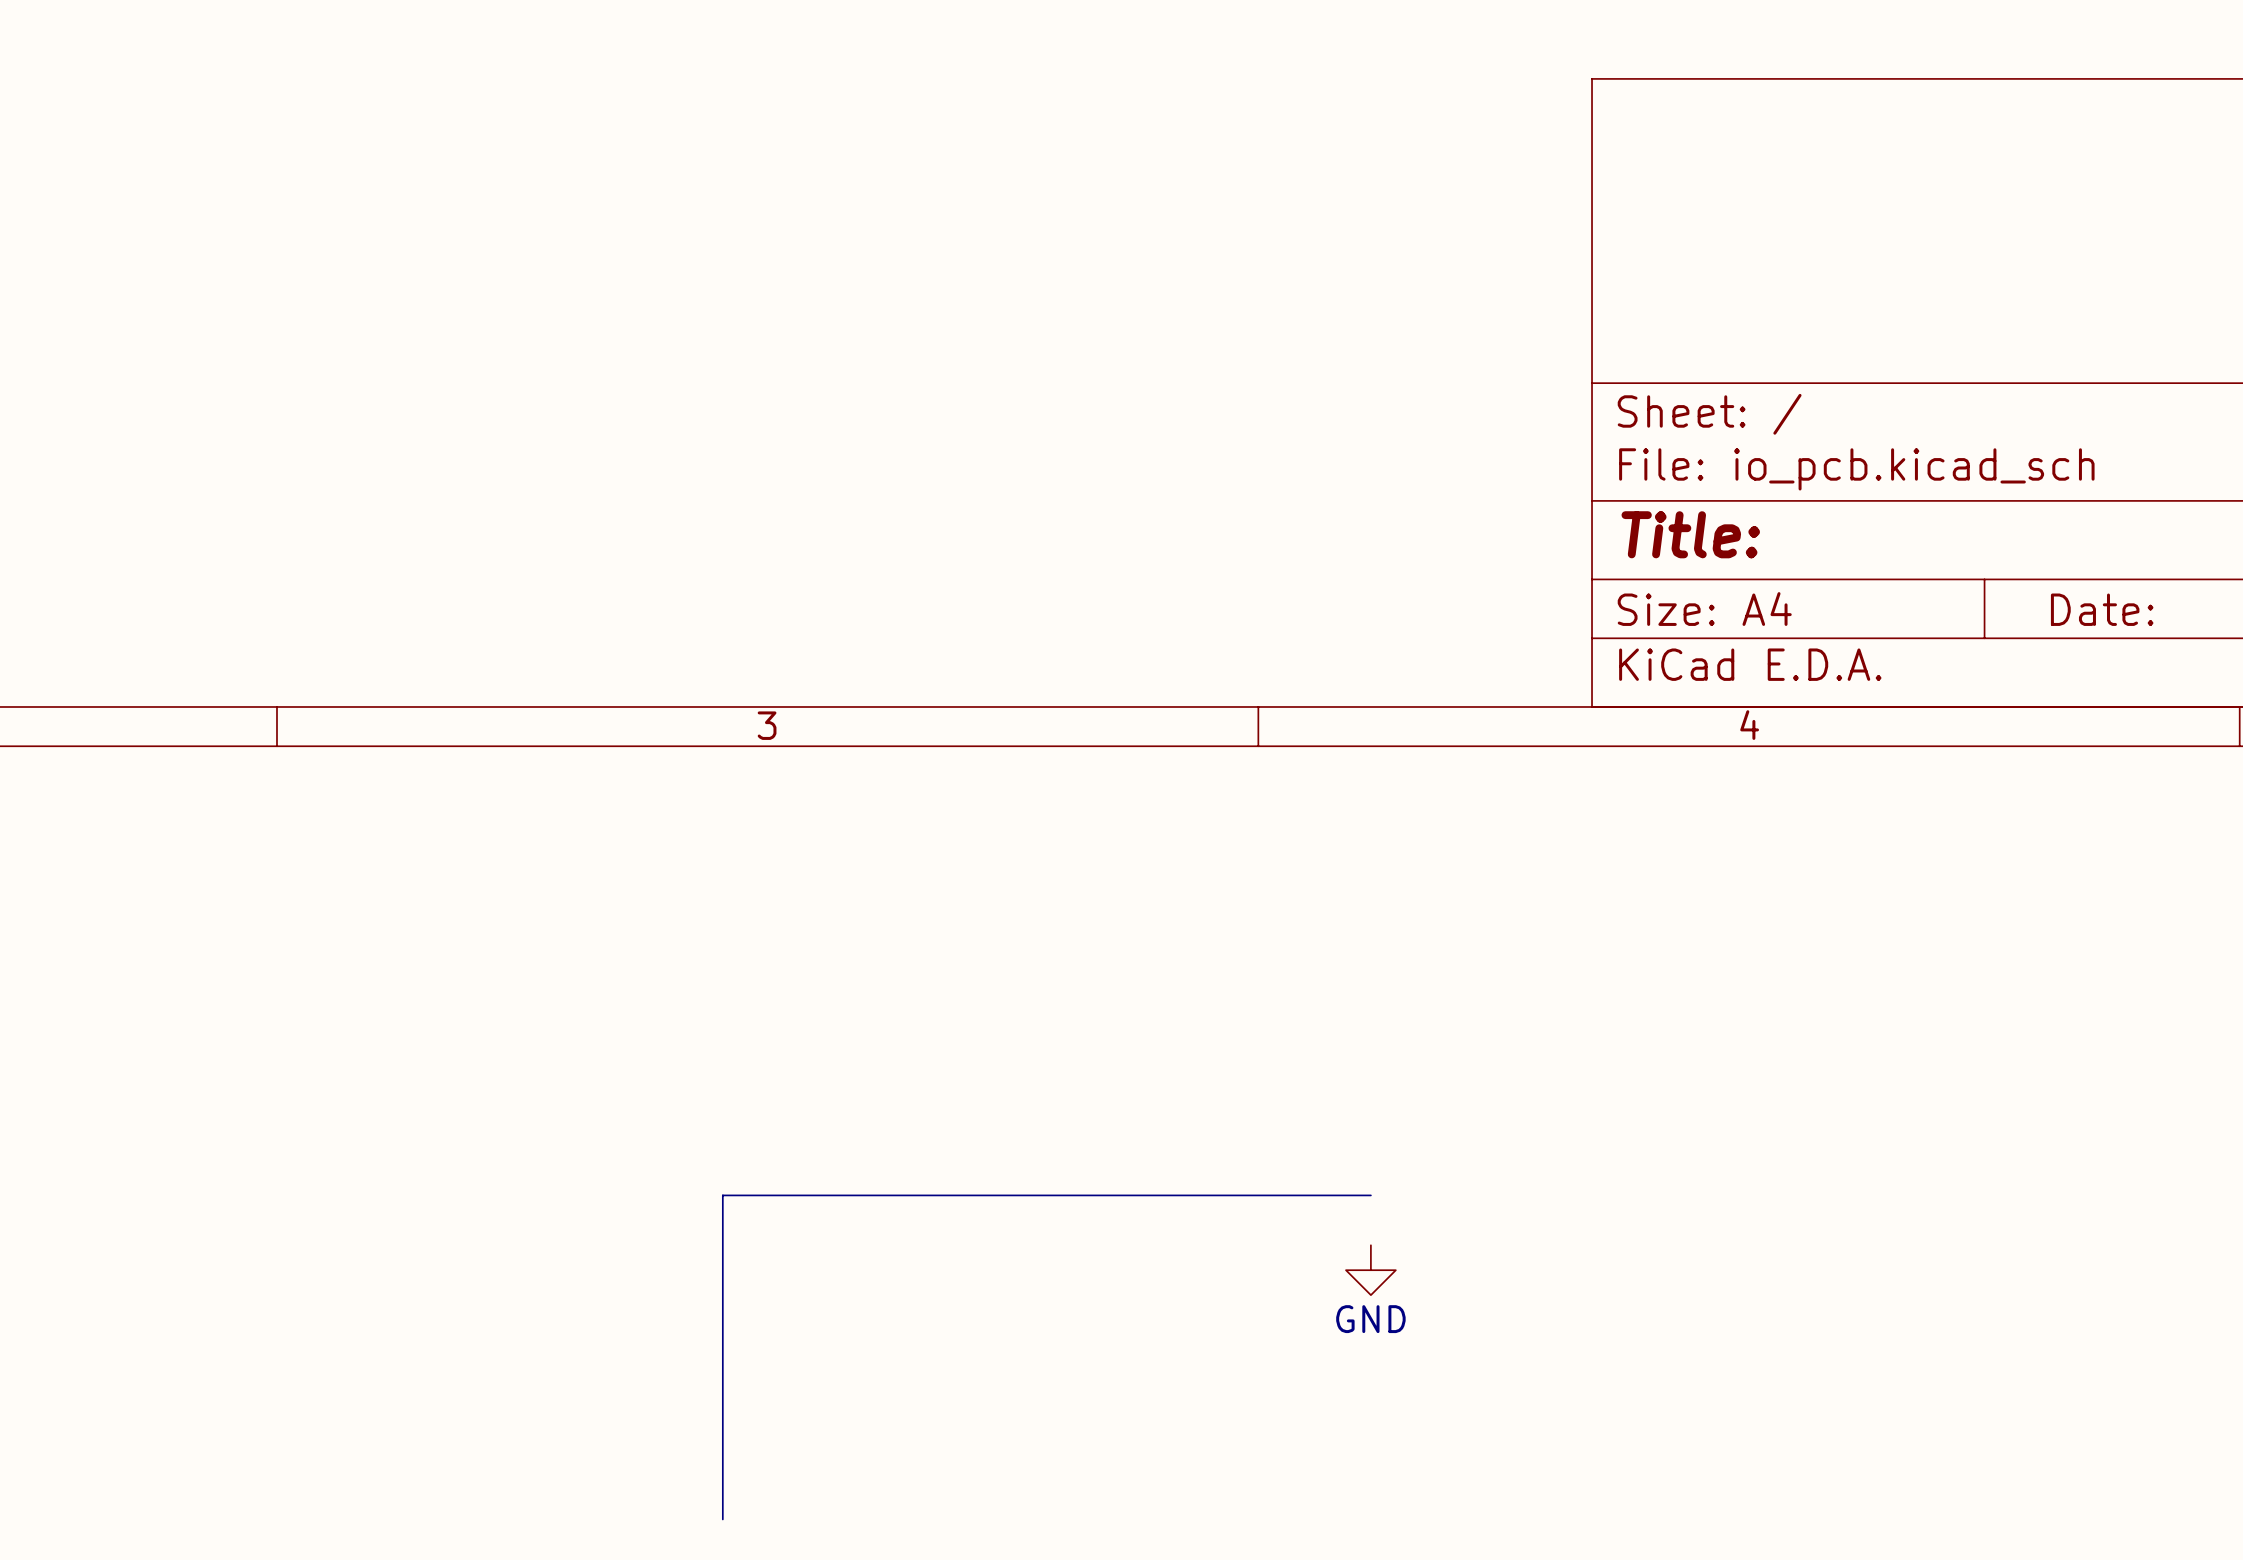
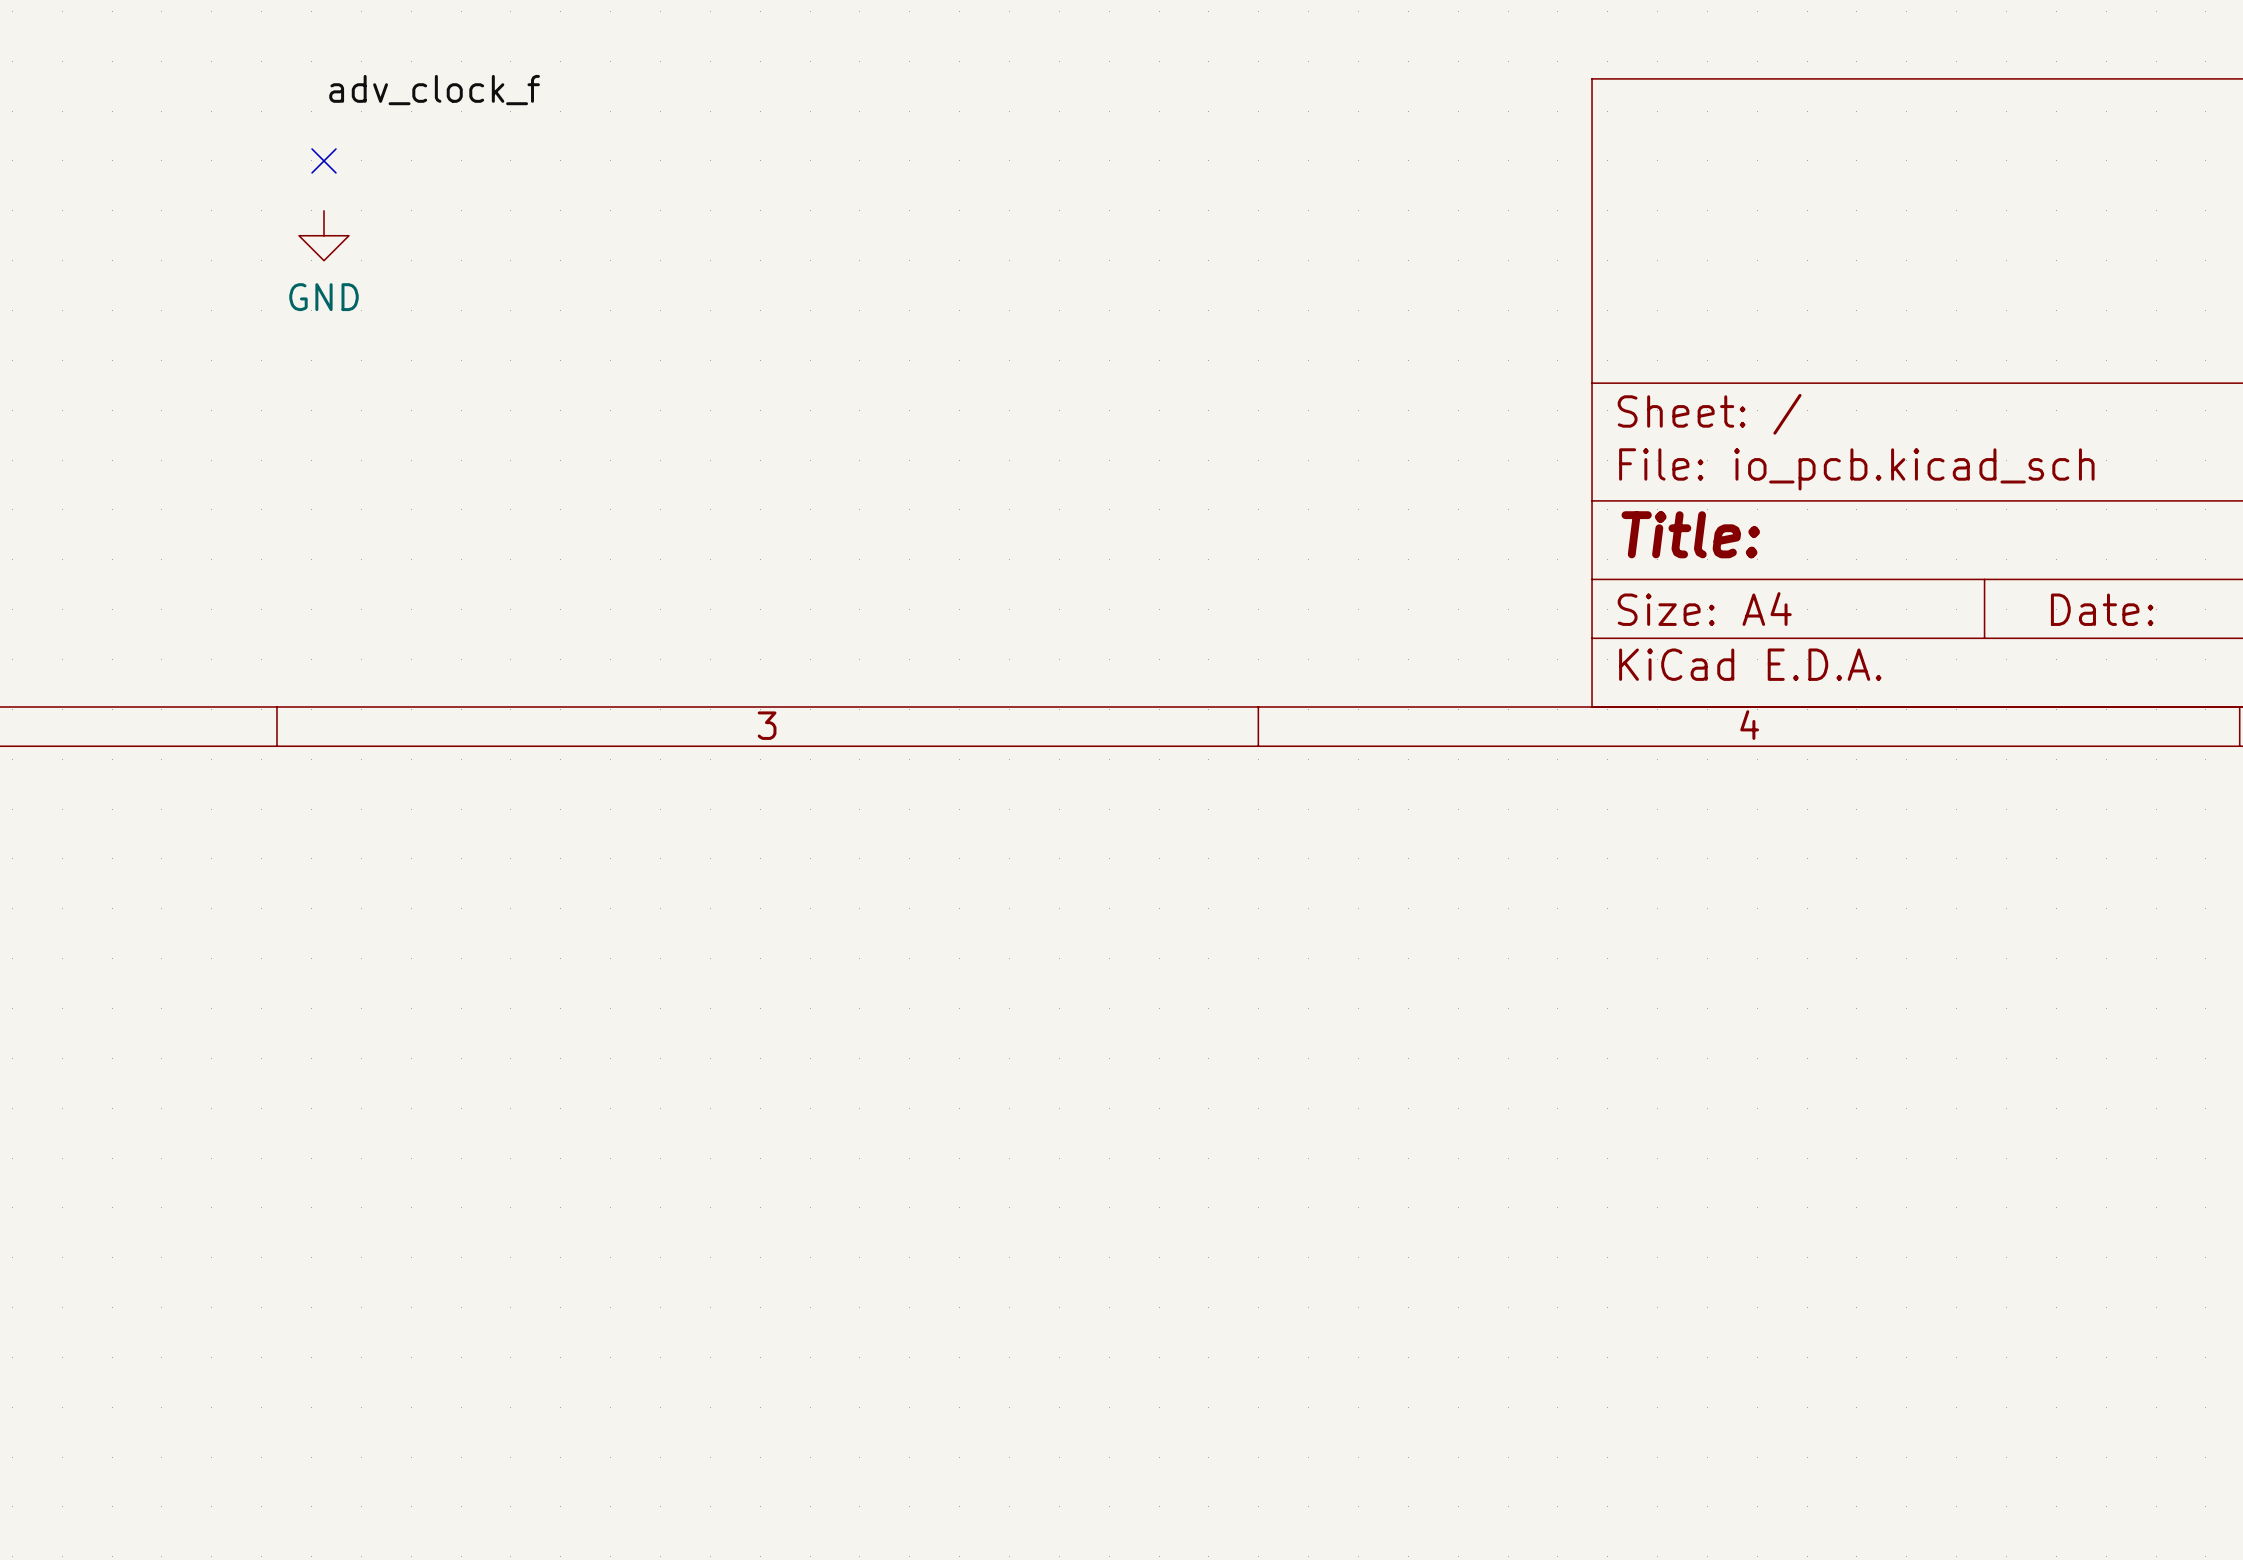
label: none -> adv_clock_f (434, 90)
no-connect mark: none -> (324, 160)
power symbol: none -> GND (324, 235)
wire: (1370, 1195) (722, 1195) (722, 1519) -> none
power symbol: GND (1370, 1270) -> none

